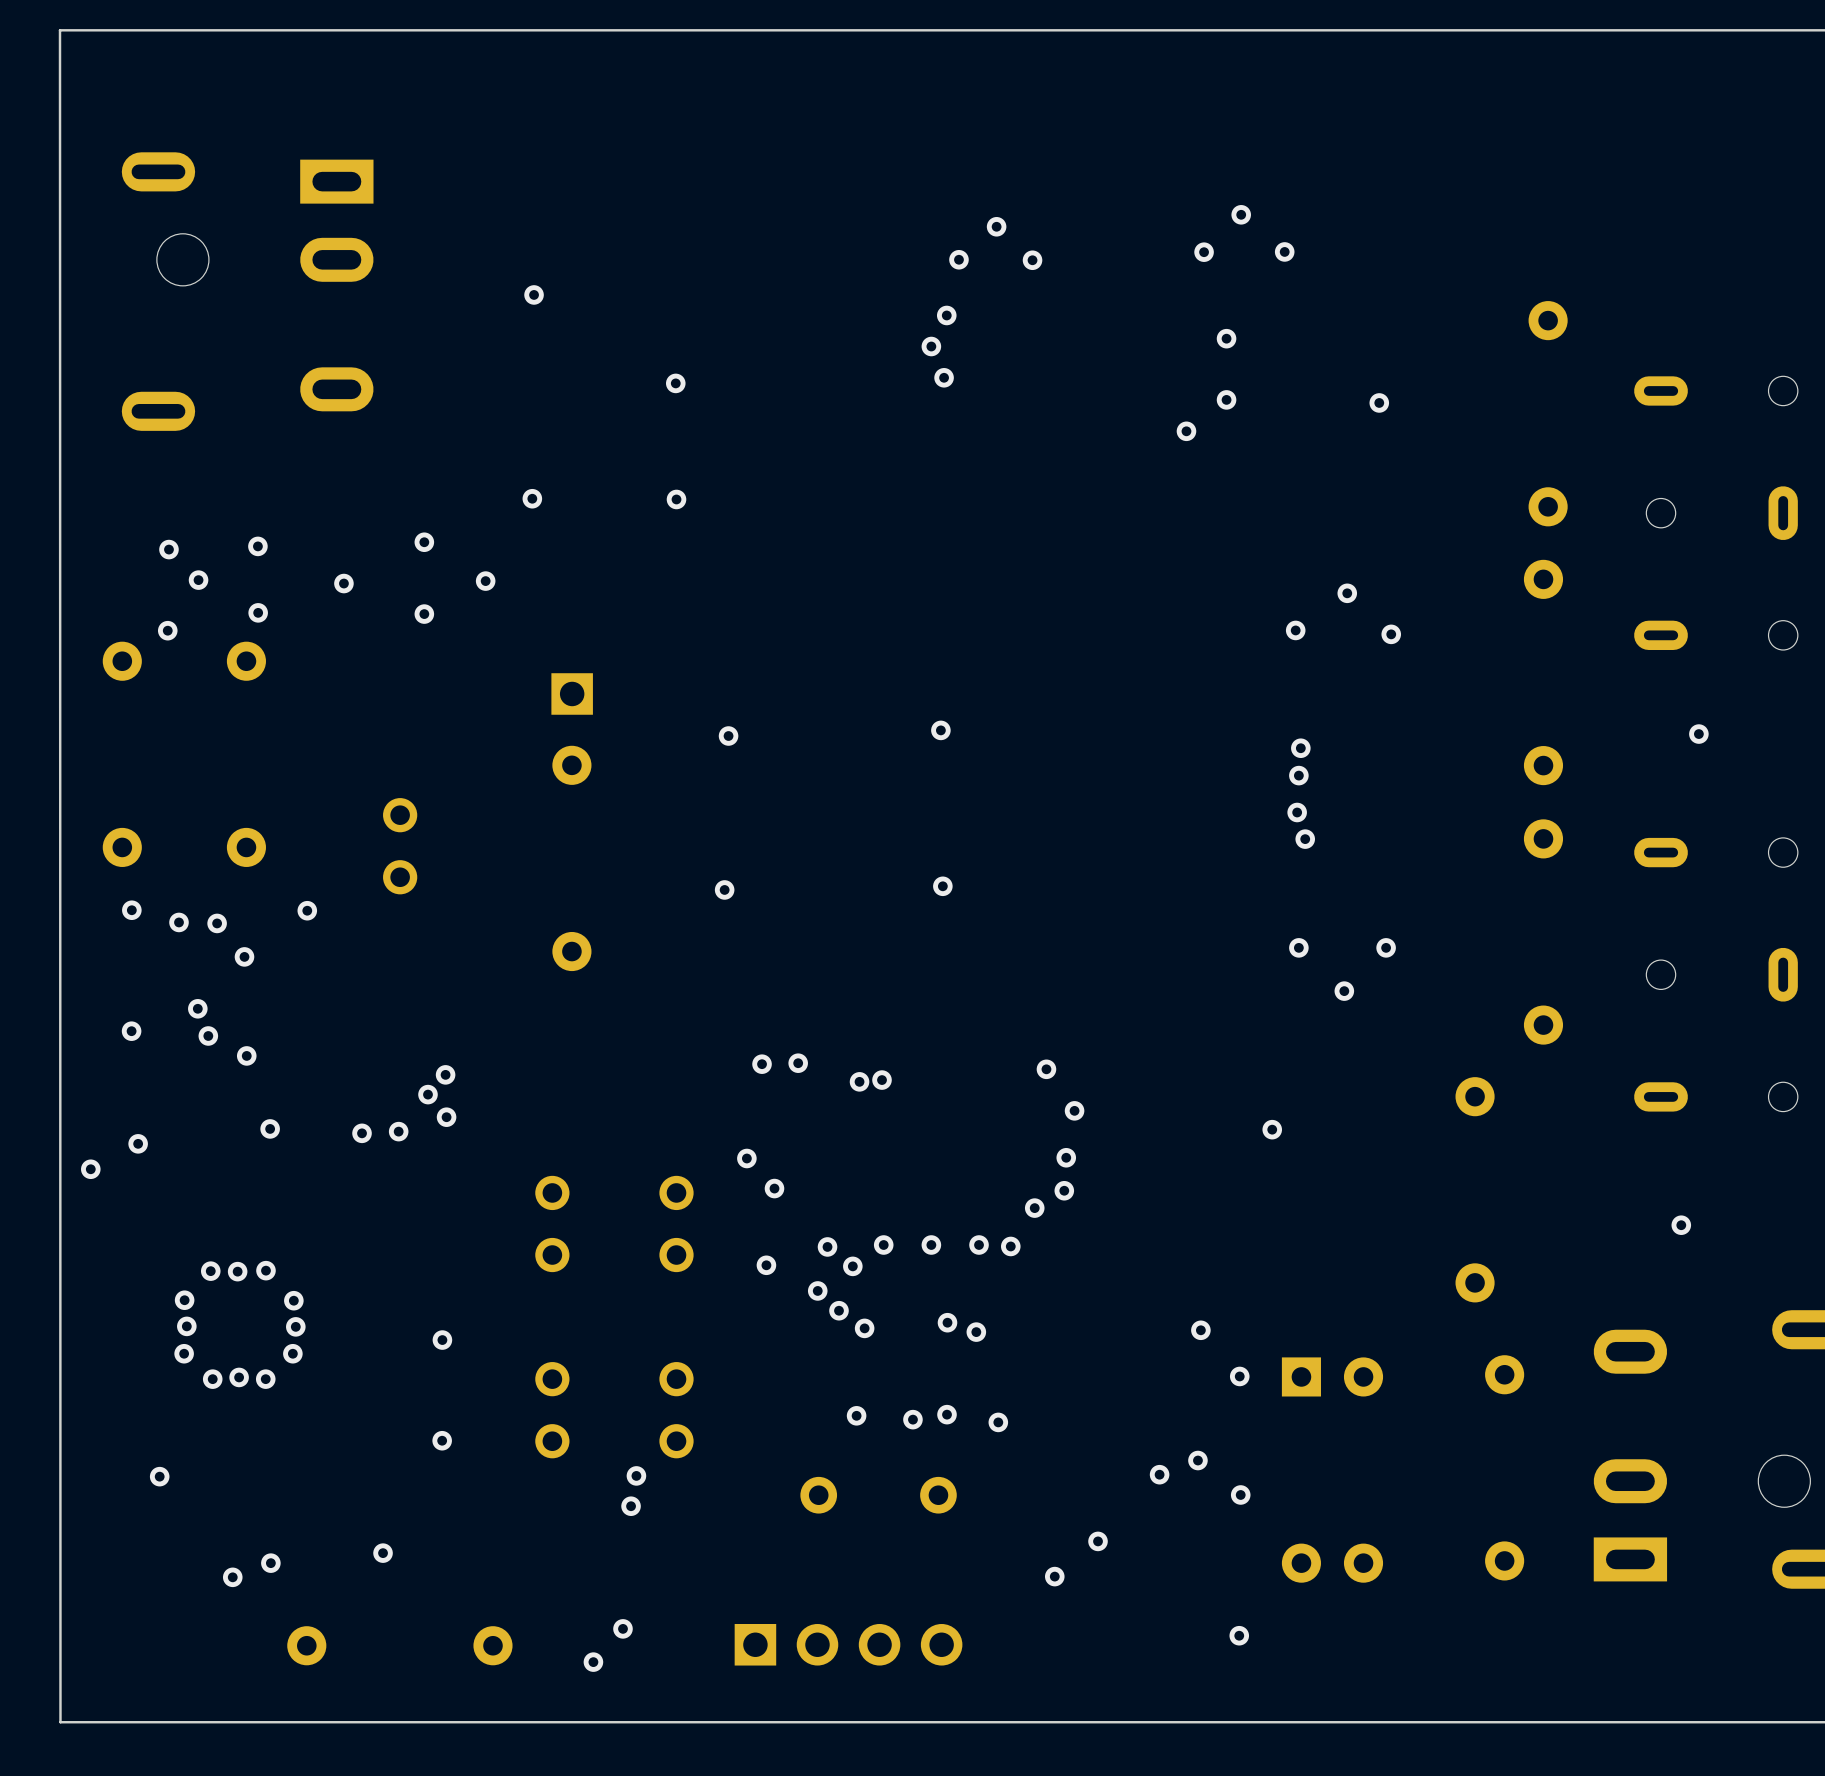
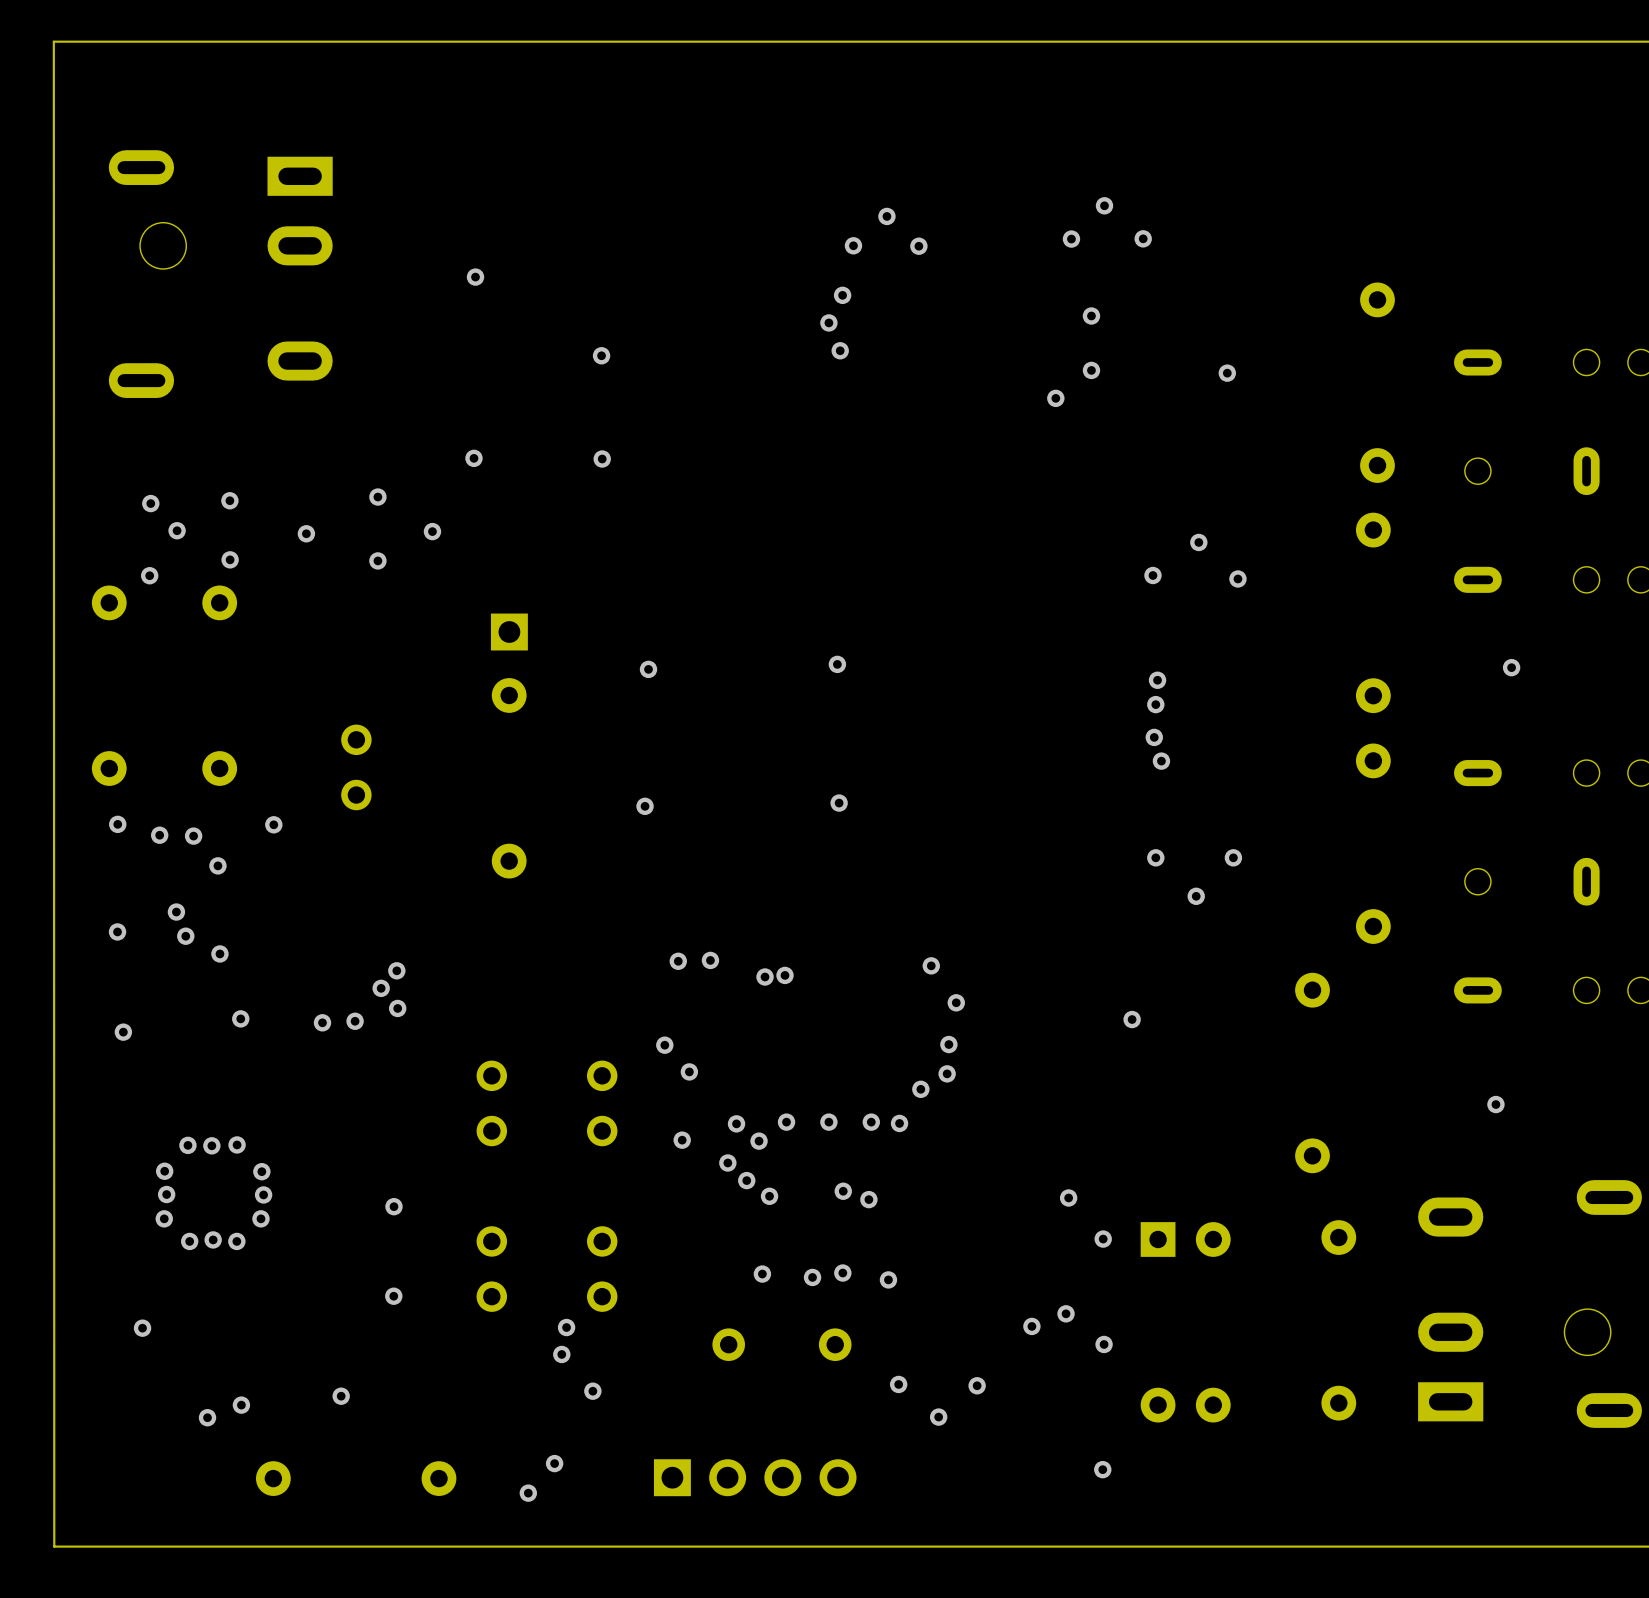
via: (90, 1169) -> none
via: none -> (898, 1384)
via: none -> (592, 1391)

